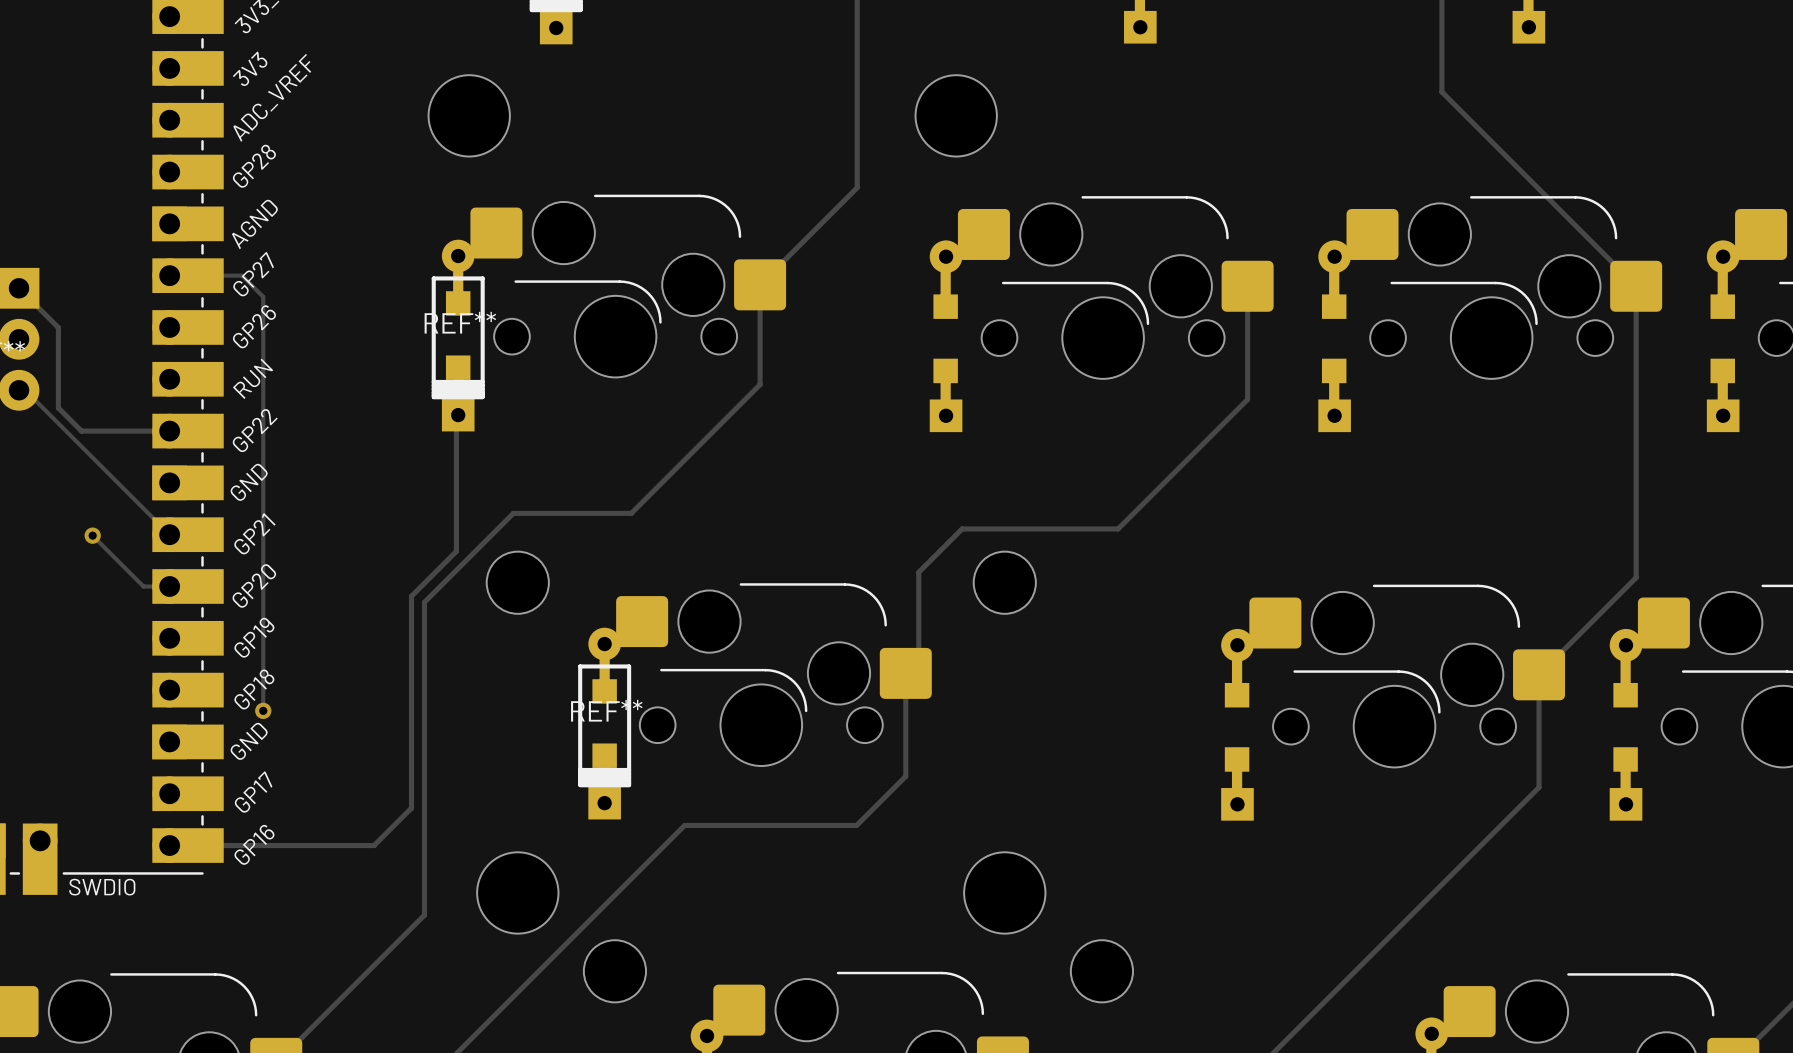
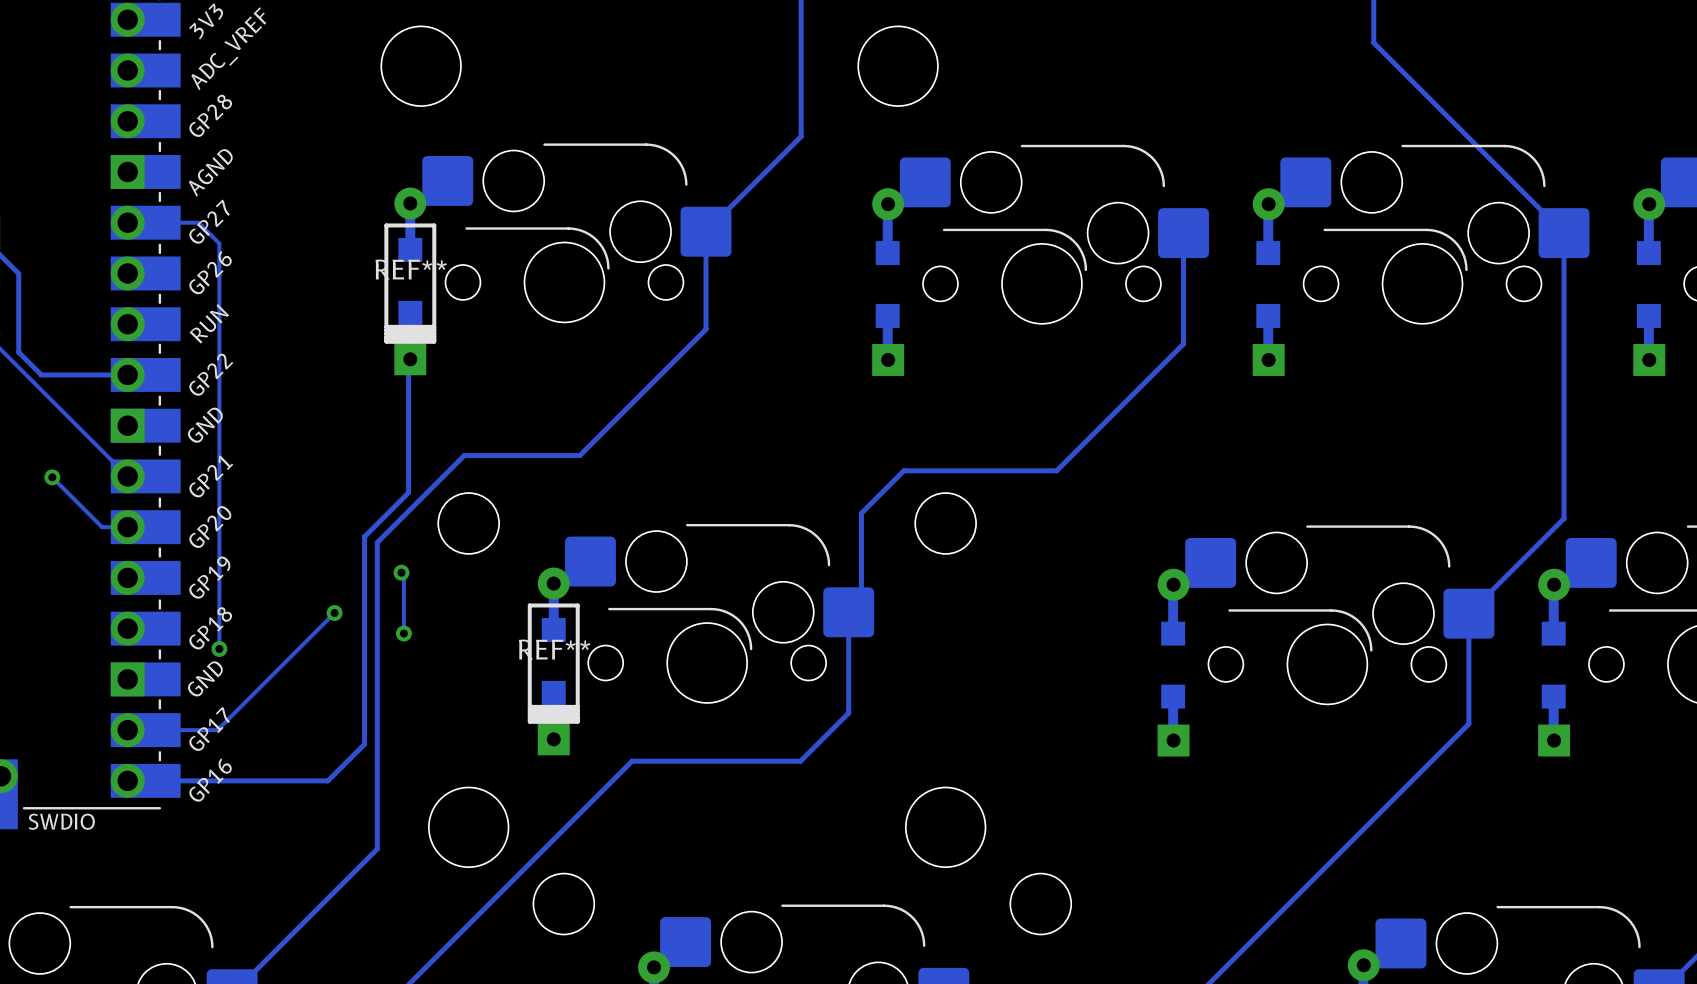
track: none -> (401, 572) (403, 575) (403, 633)
via: none -> (401, 572)
track: none -> (334, 613) (217, 730) (127, 730)
via: none -> (334, 613)
via: none -> (403, 633)

